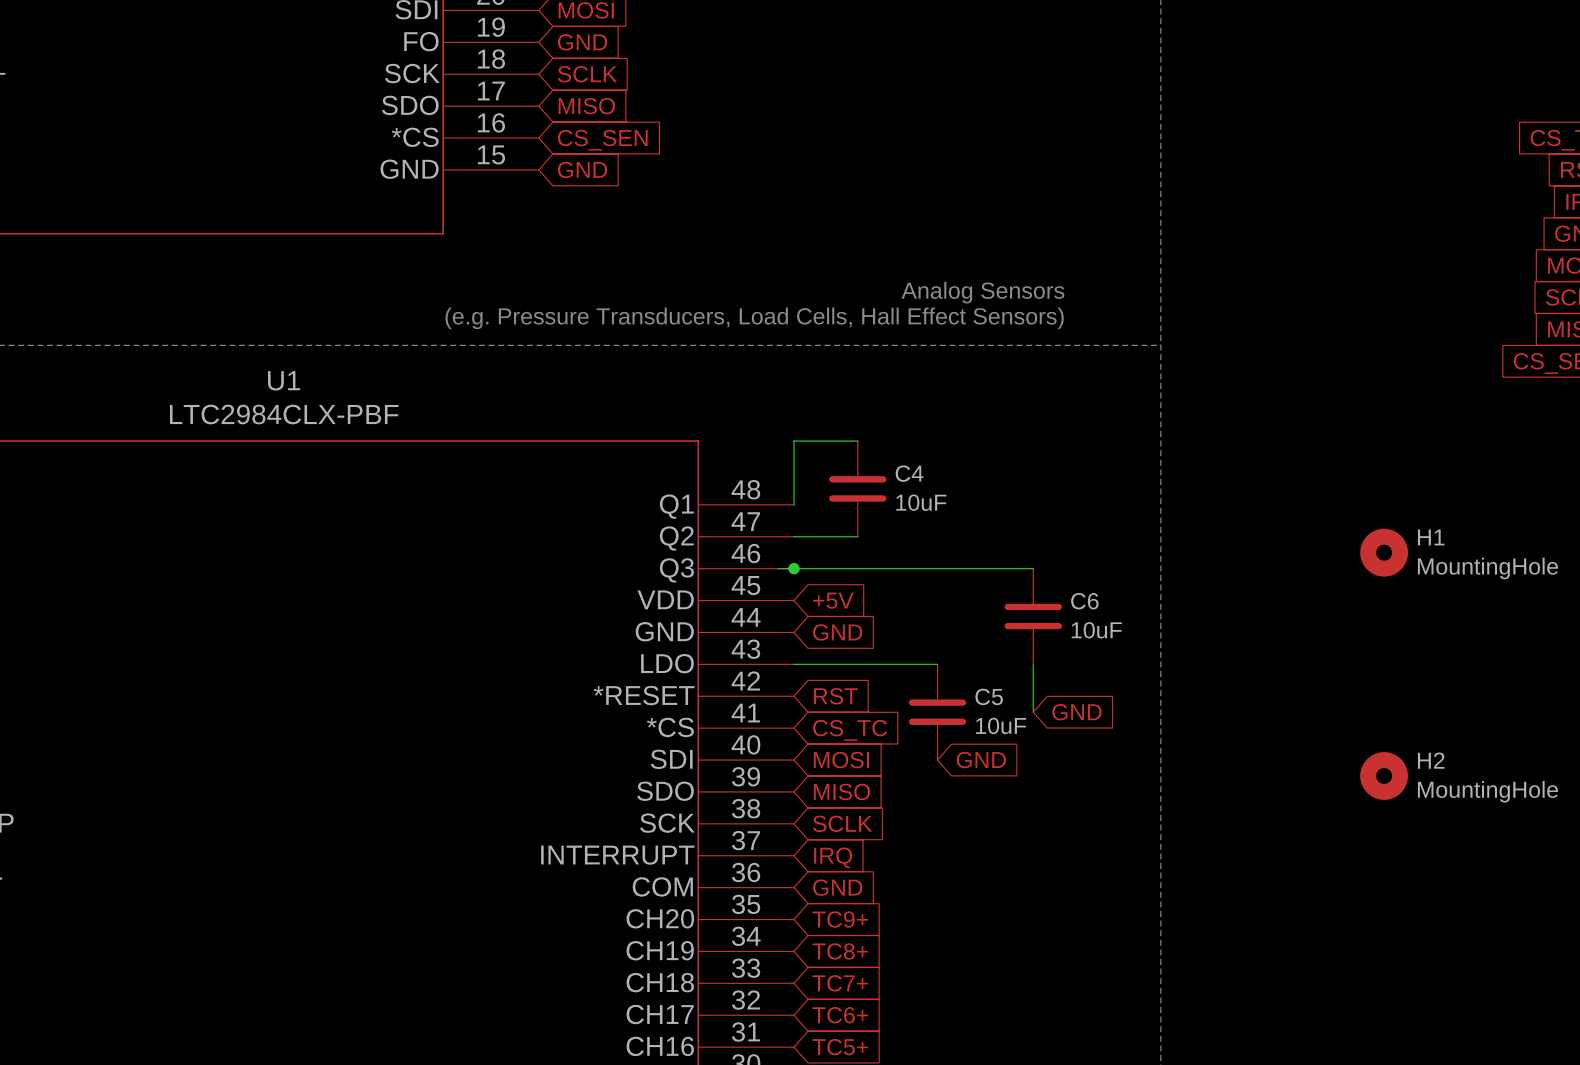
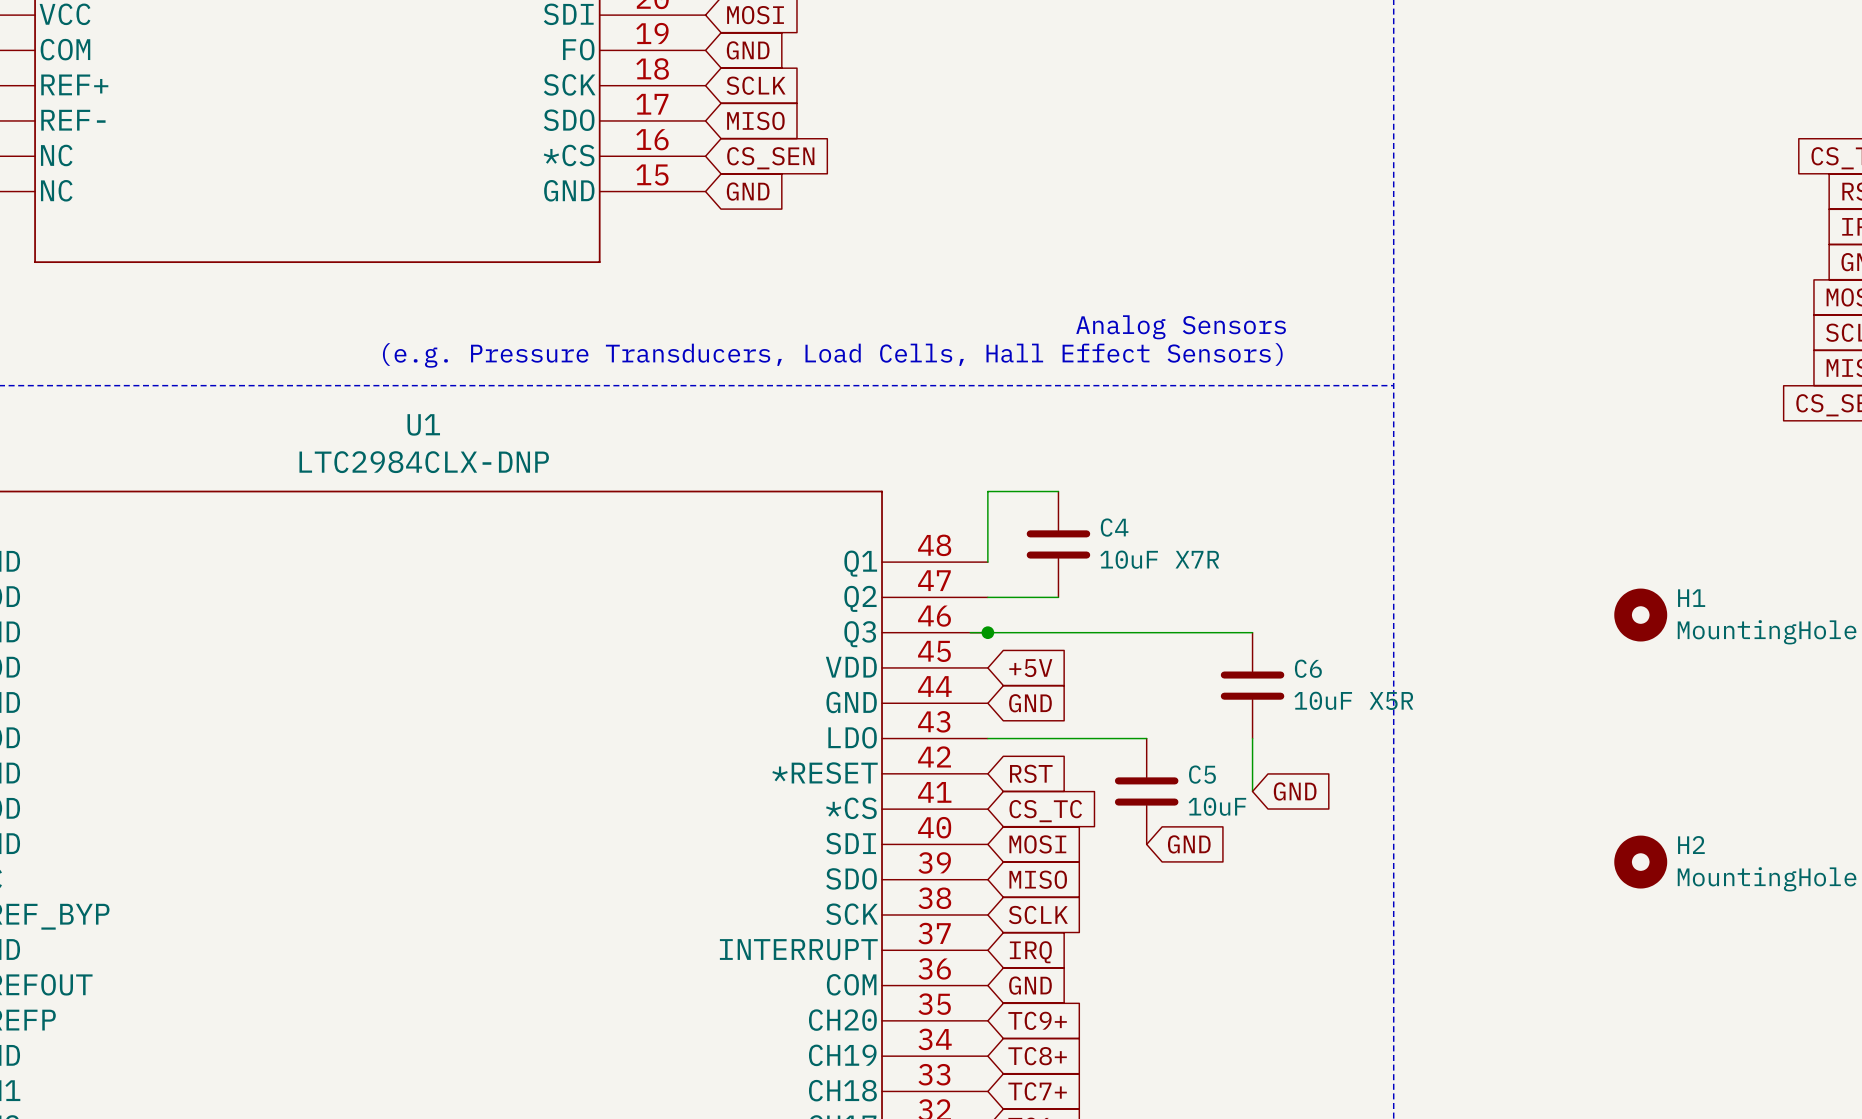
U1 value: LTC2984CLX-PBF (284, 414) -> LTC2984CLX-DNP (424, 462)
C4 value: 10uF (921, 502) -> 10uF X7R (1159, 559)
C6 value: 10uF (1096, 630) -> 10uF X5R (1353, 700)

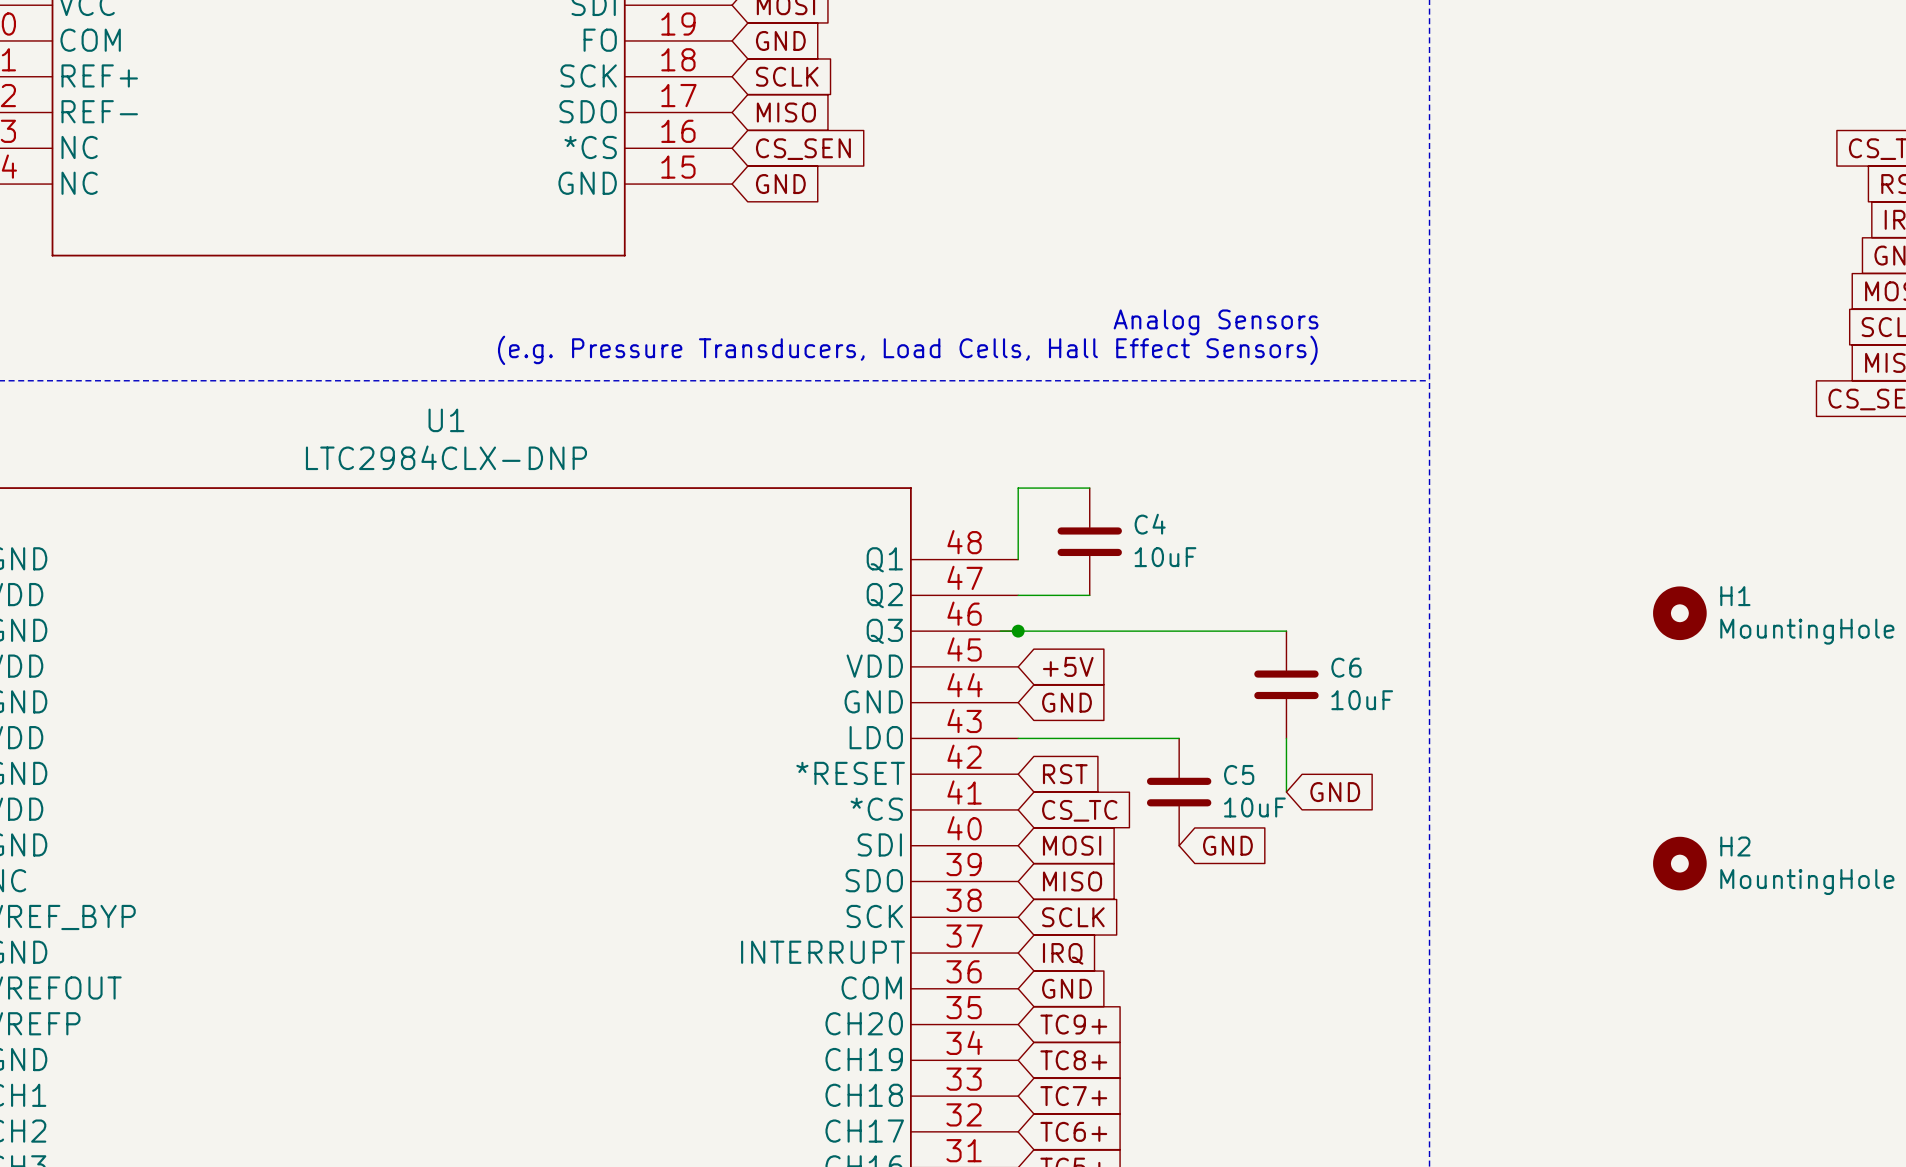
C4 value: 10uF X7R (1159, 559) -> 10uF (1165, 557)
C6 value: 10uF X5R (1353, 700) -> 10uF (1362, 700)

